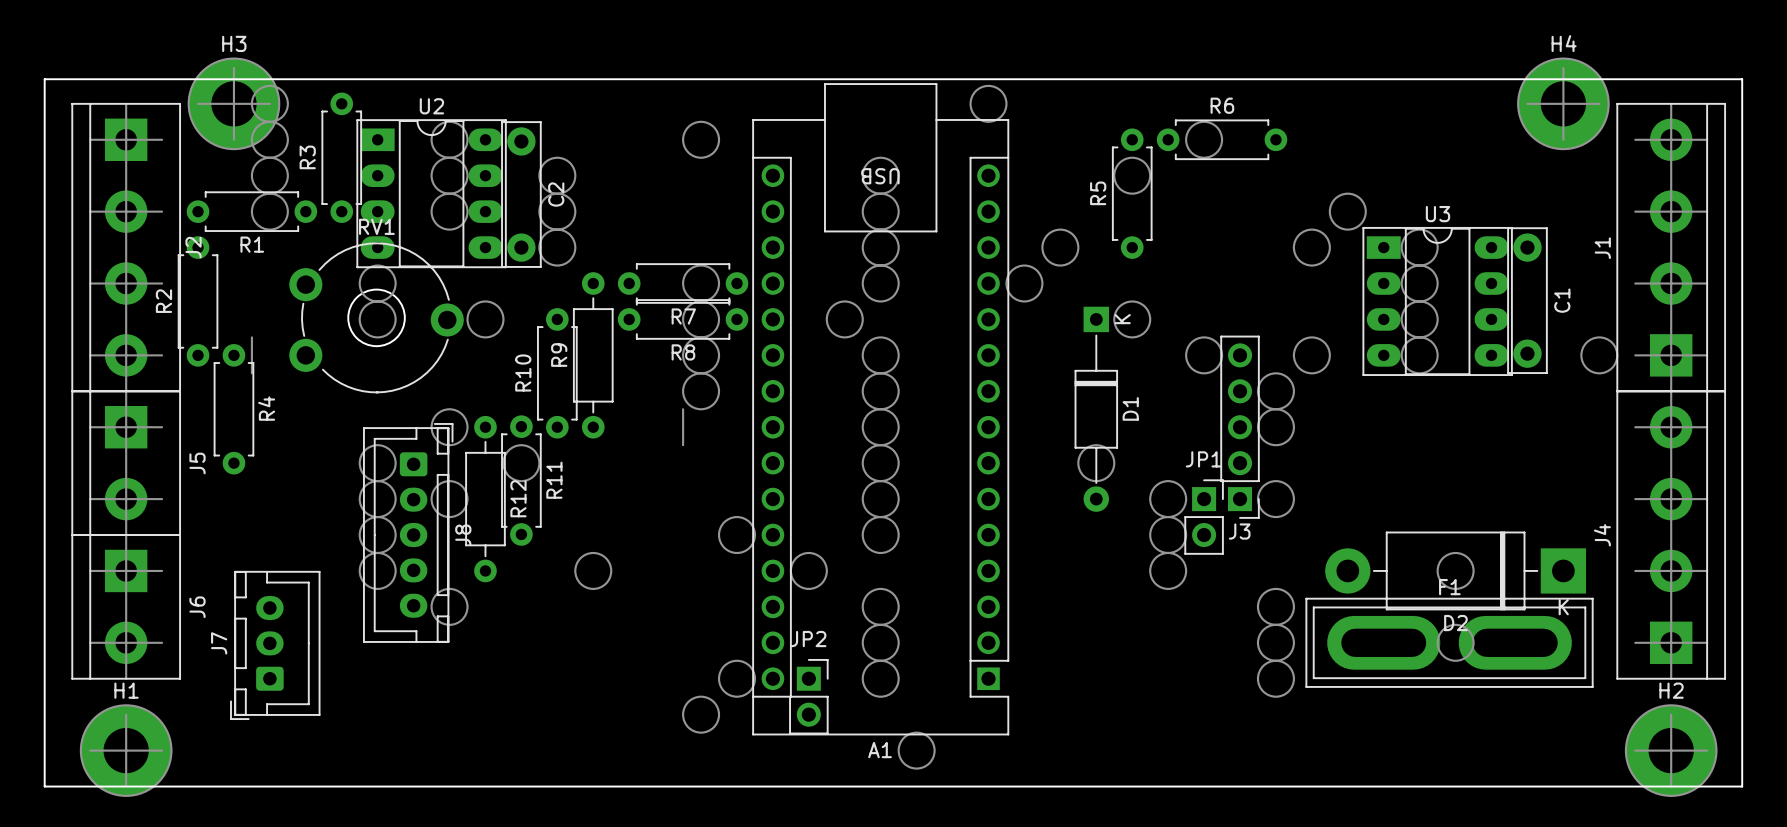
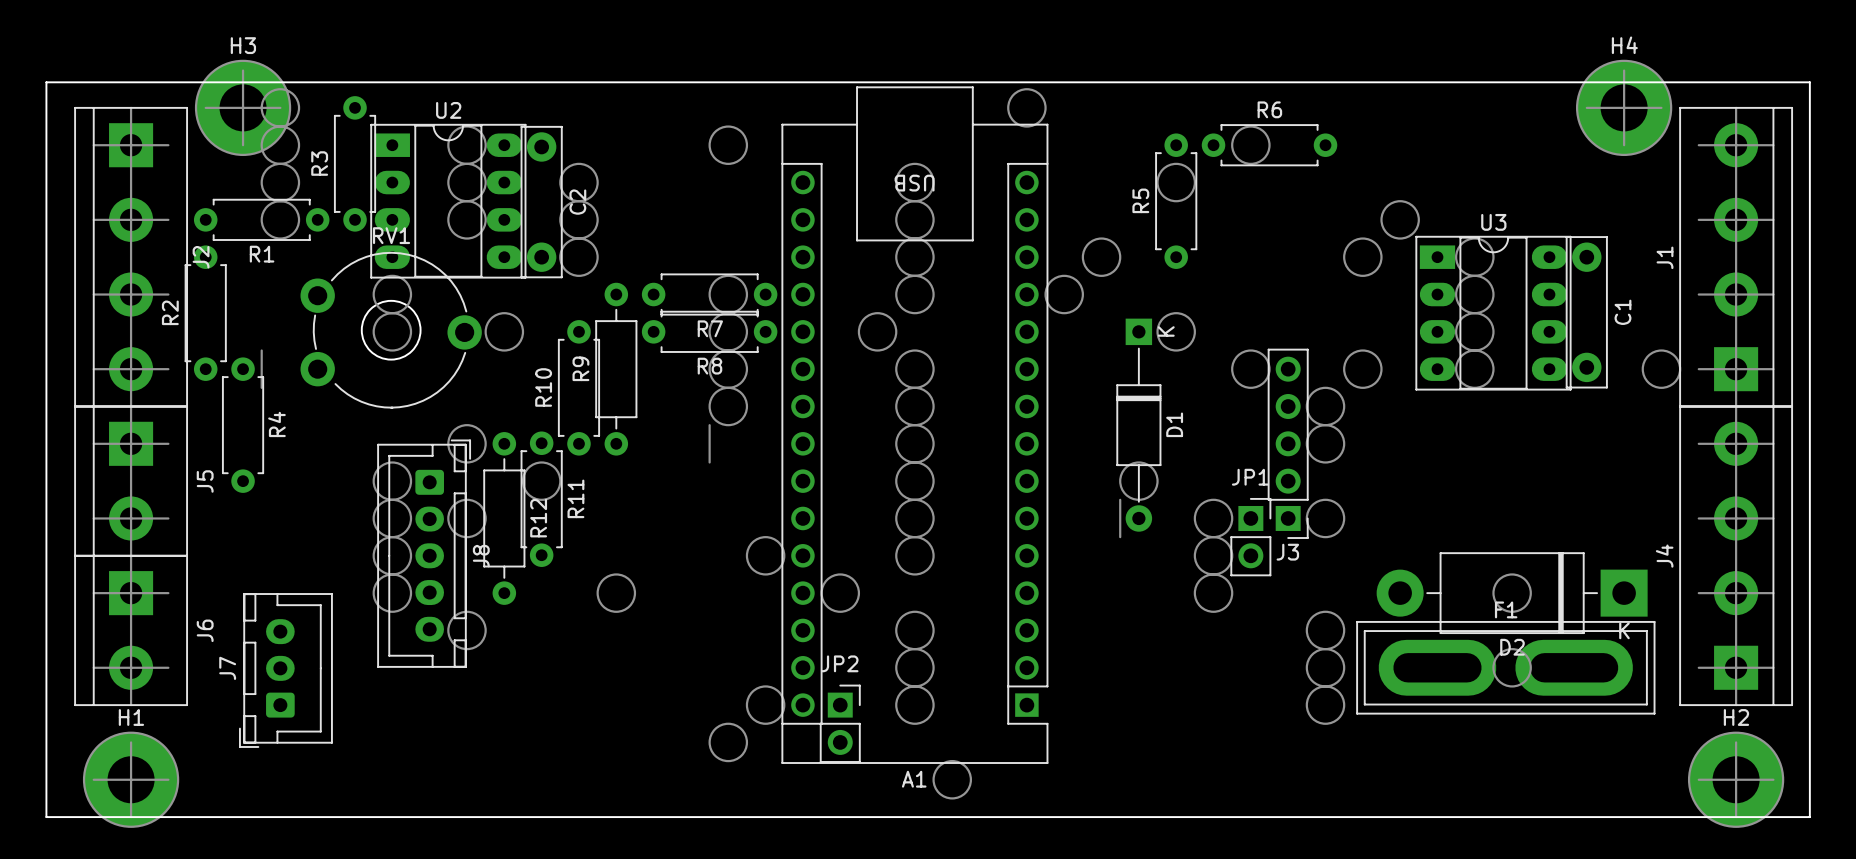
line: none -> (1120, 499) (1120, 537)

